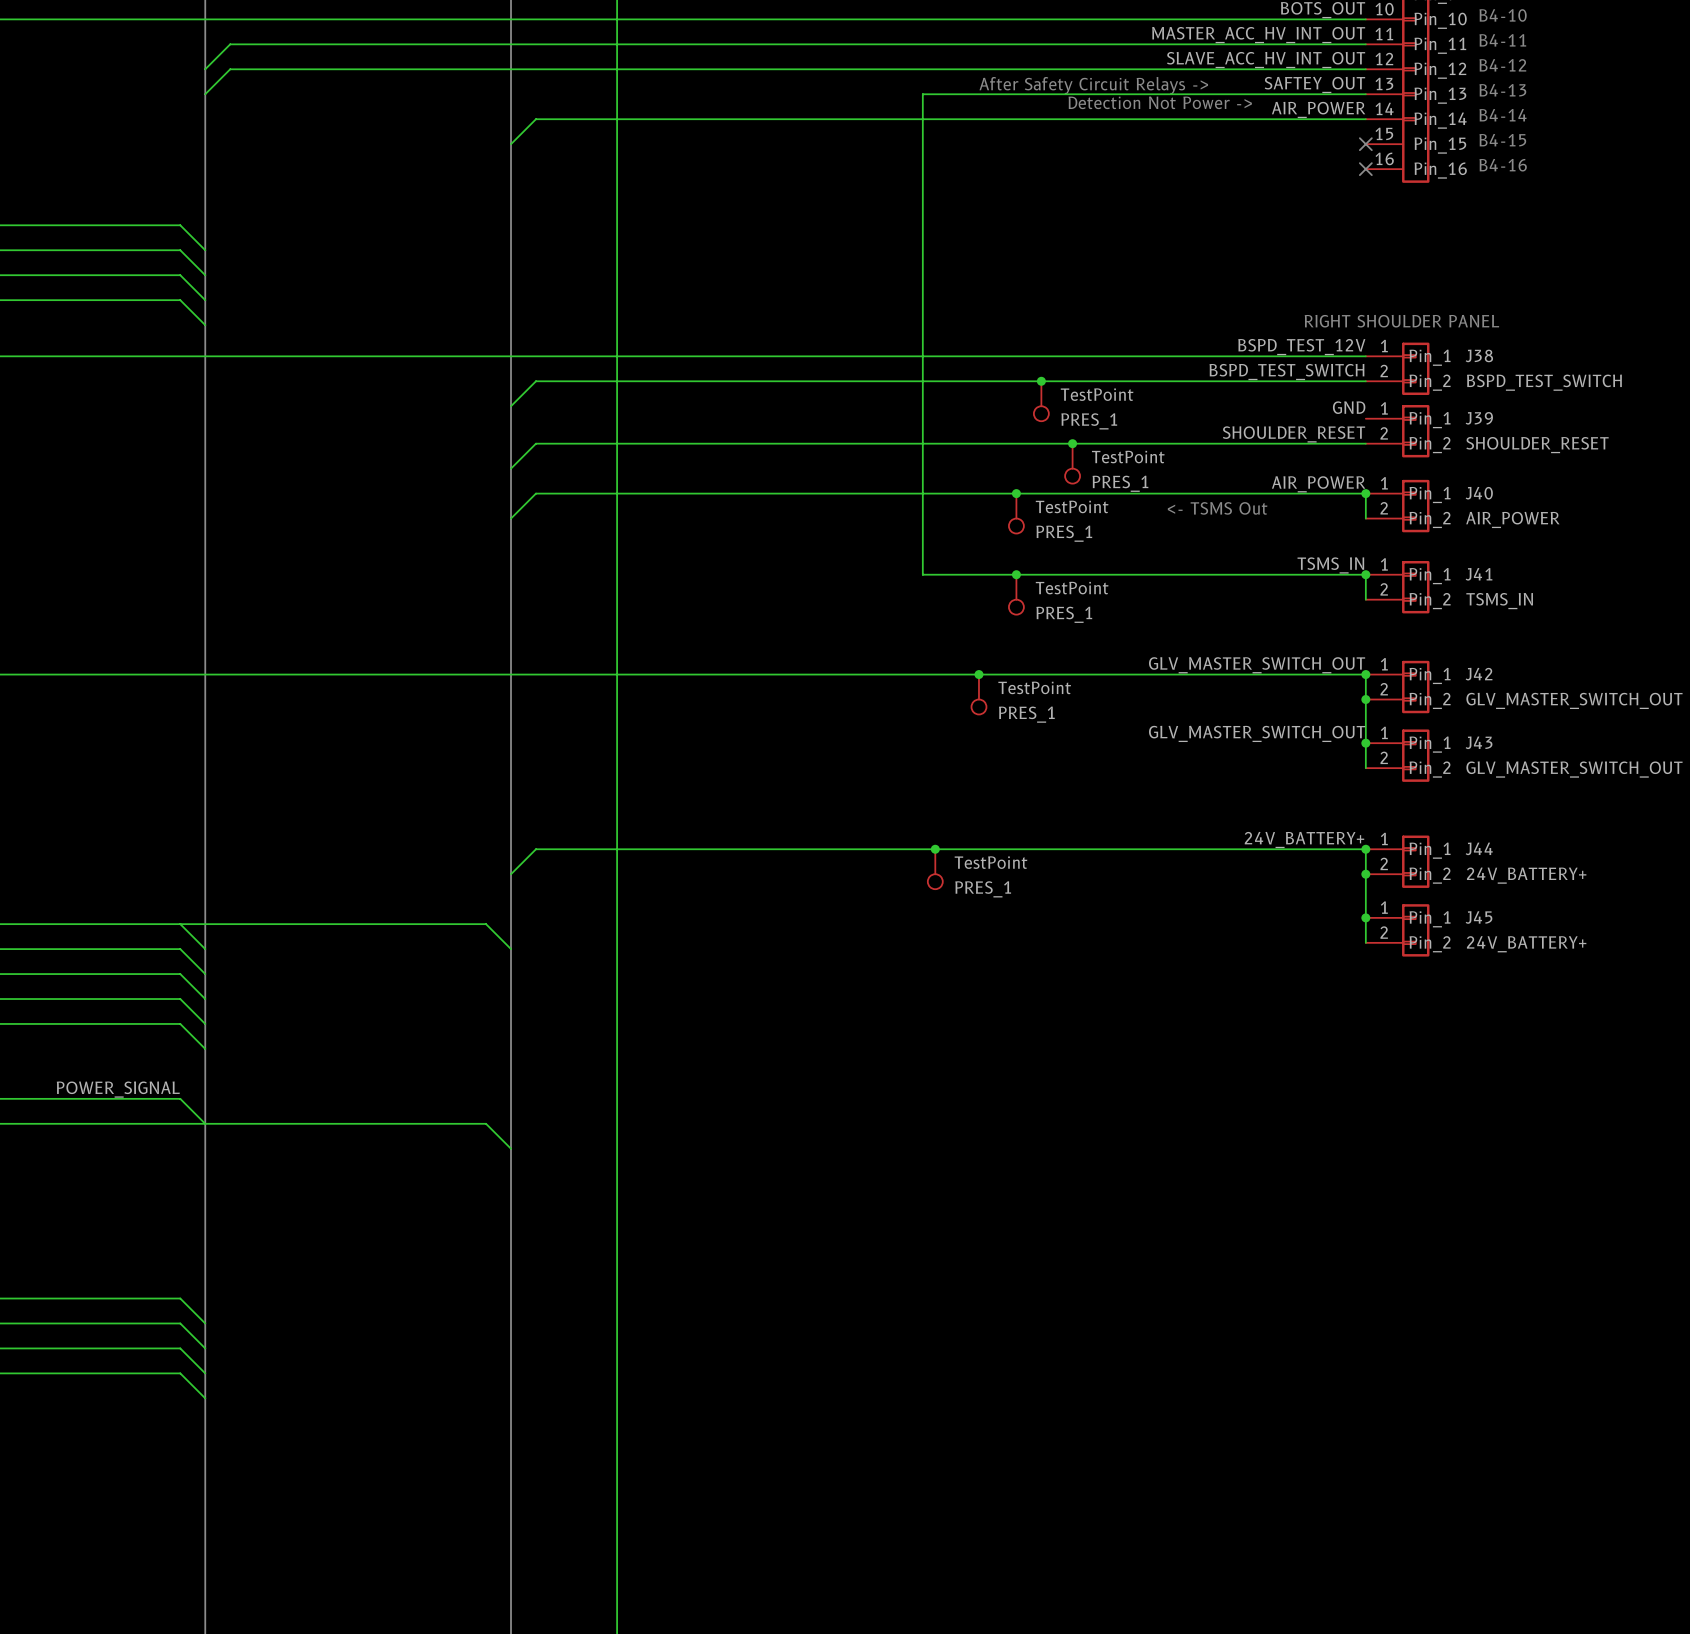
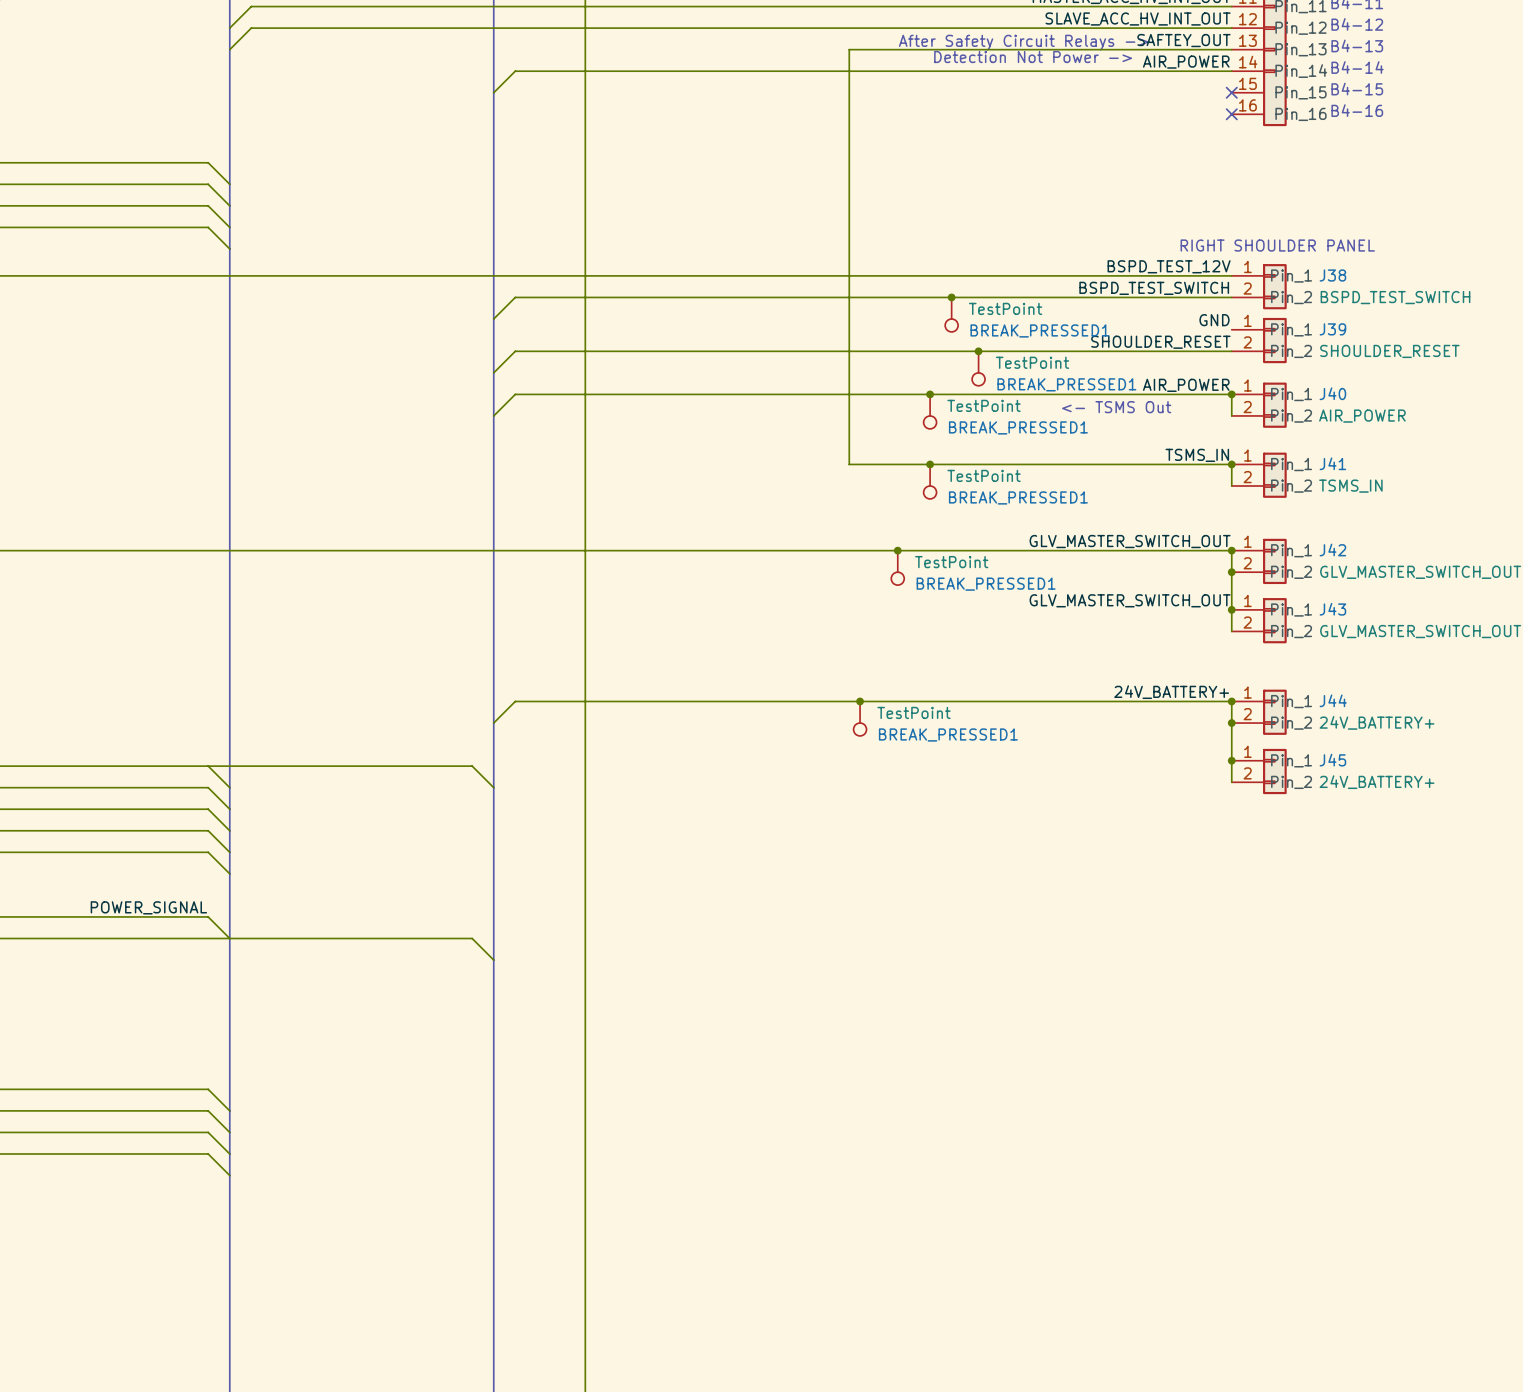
PRES_1 name: PRES_1 (1089, 421) -> BREAK_PRESSED1 (1039, 330)
PRES_1 name: PRES_1 (1120, 483) -> BREAK_PRESSED1 (1066, 384)
PRES_1 name: PRES_1 (1064, 533) -> BREAK_PRESSED1 (1018, 427)
PRES_1 name: PRES_1 (1064, 614) -> BREAK_PRESSED1 (1018, 497)
PRES_1 name: PRES_1 (1026, 714) -> BREAK_PRESSED1 (986, 584)
PRES_1 name: PRES_1 (983, 889) -> BREAK_PRESSED1 (948, 734)

